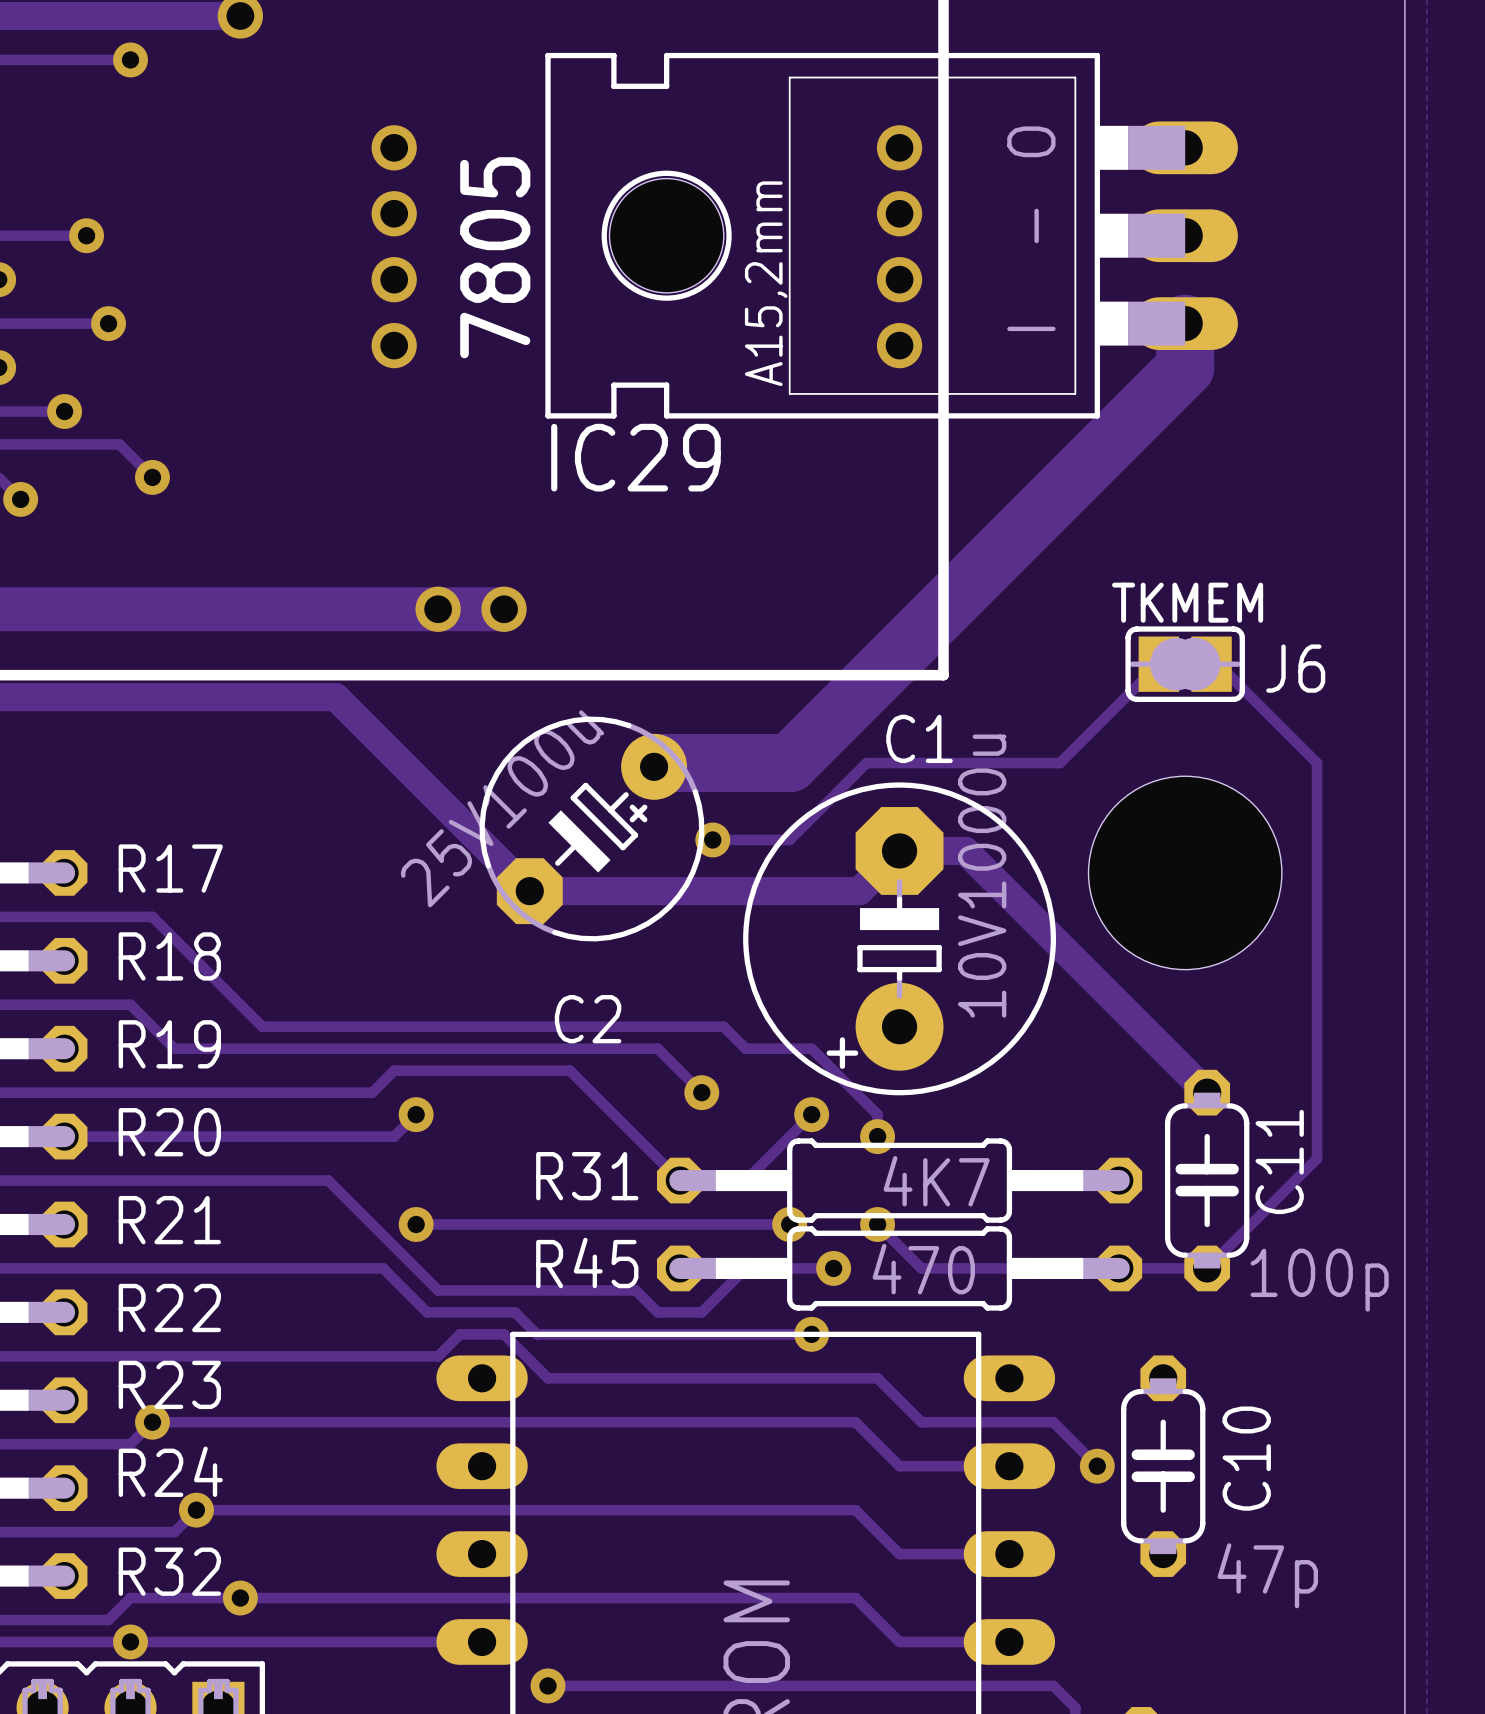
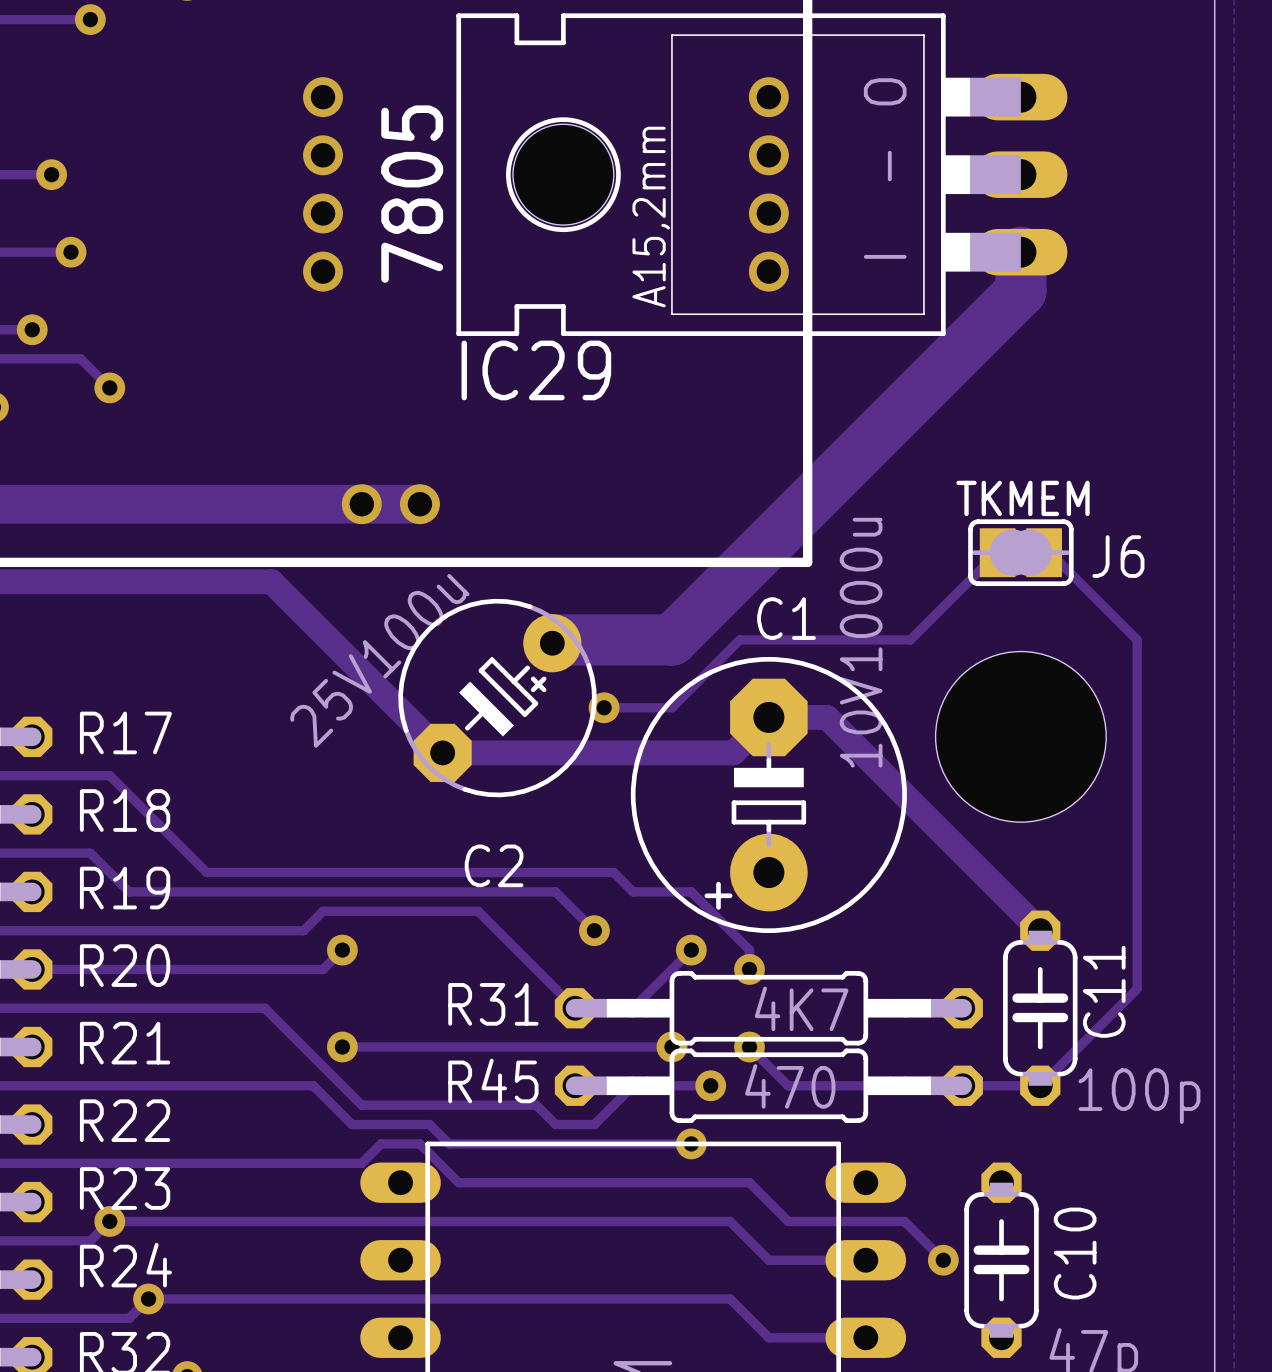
C2 value position: 25V100u (502, 808) -> 25V100u (379, 660)
C1 value position: 10V1000u (982, 876) -> 10V1000u (861, 642)

